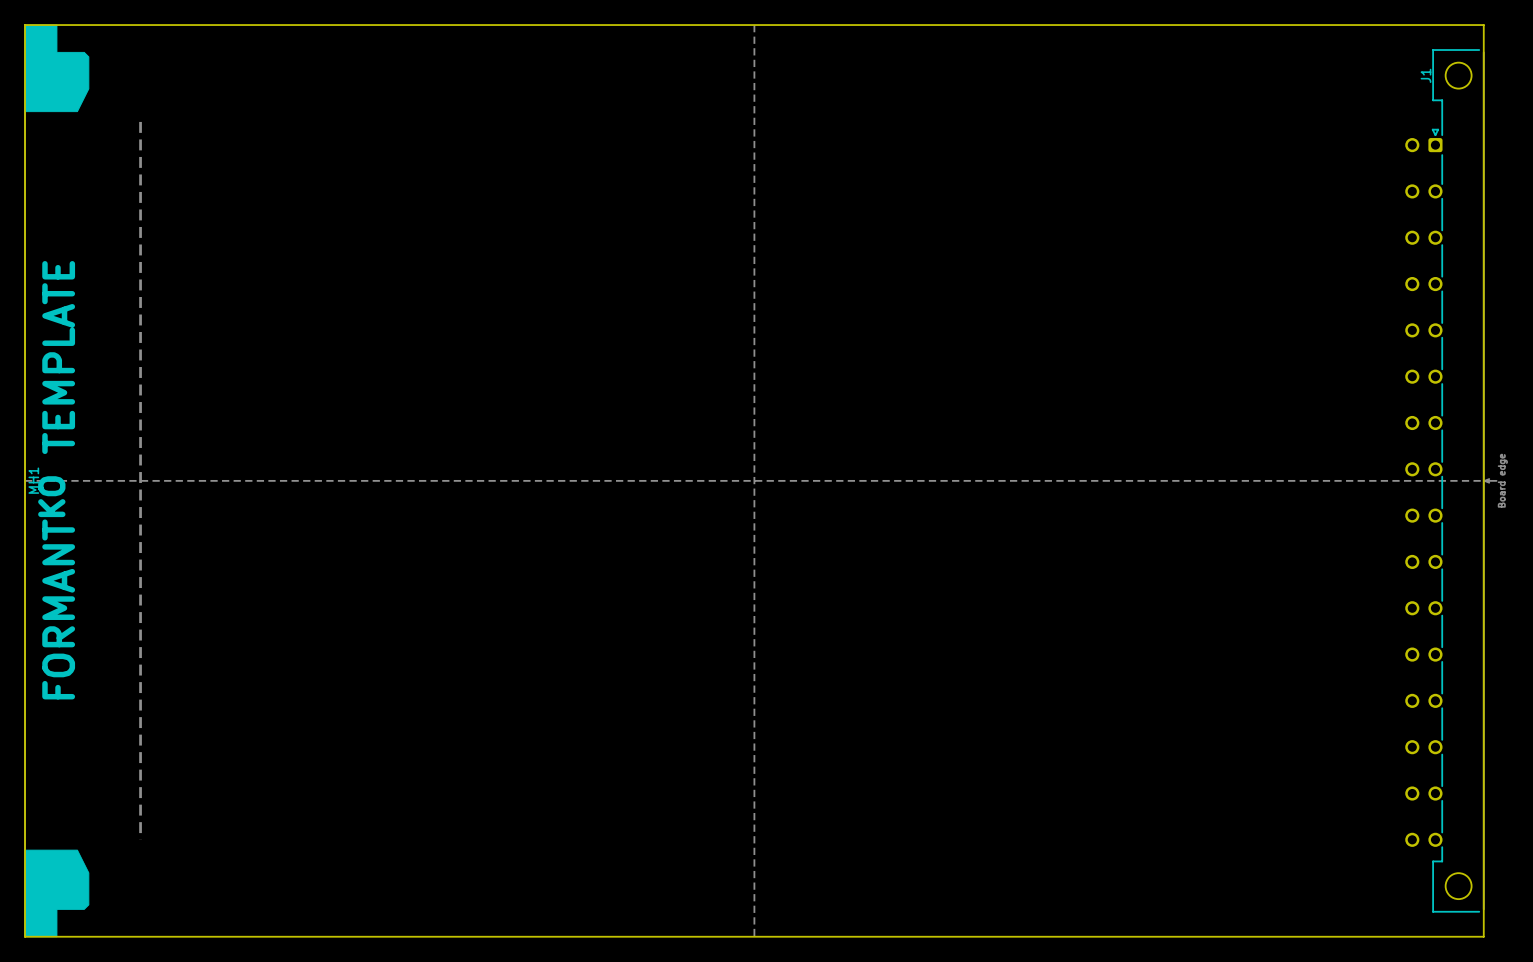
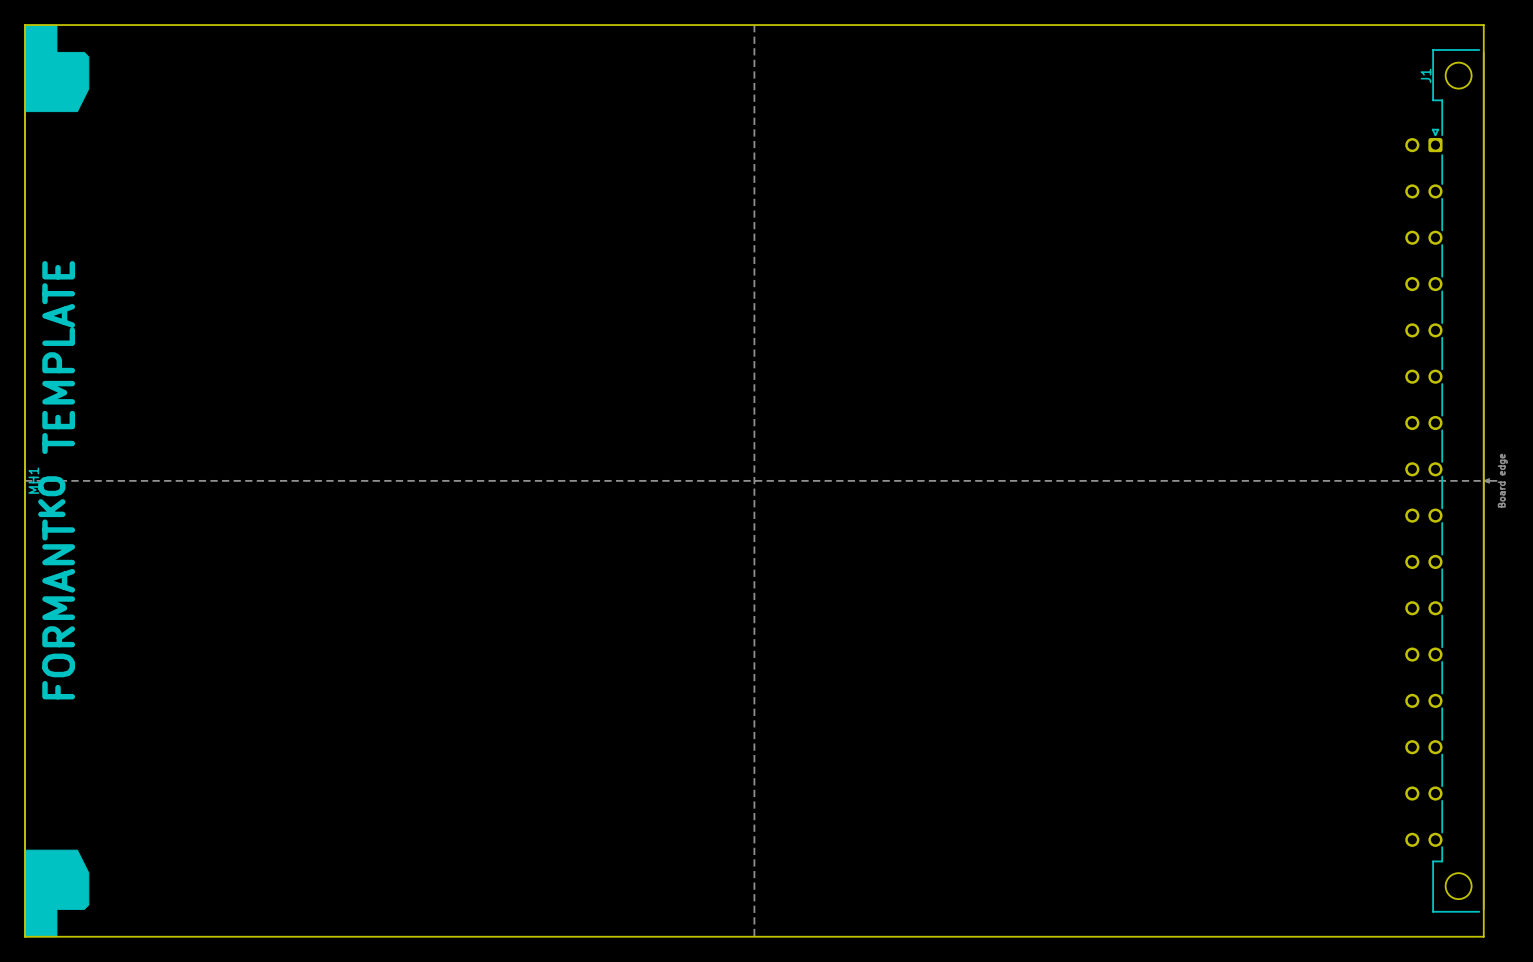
line: (140, 121) (140, 839) -> none

